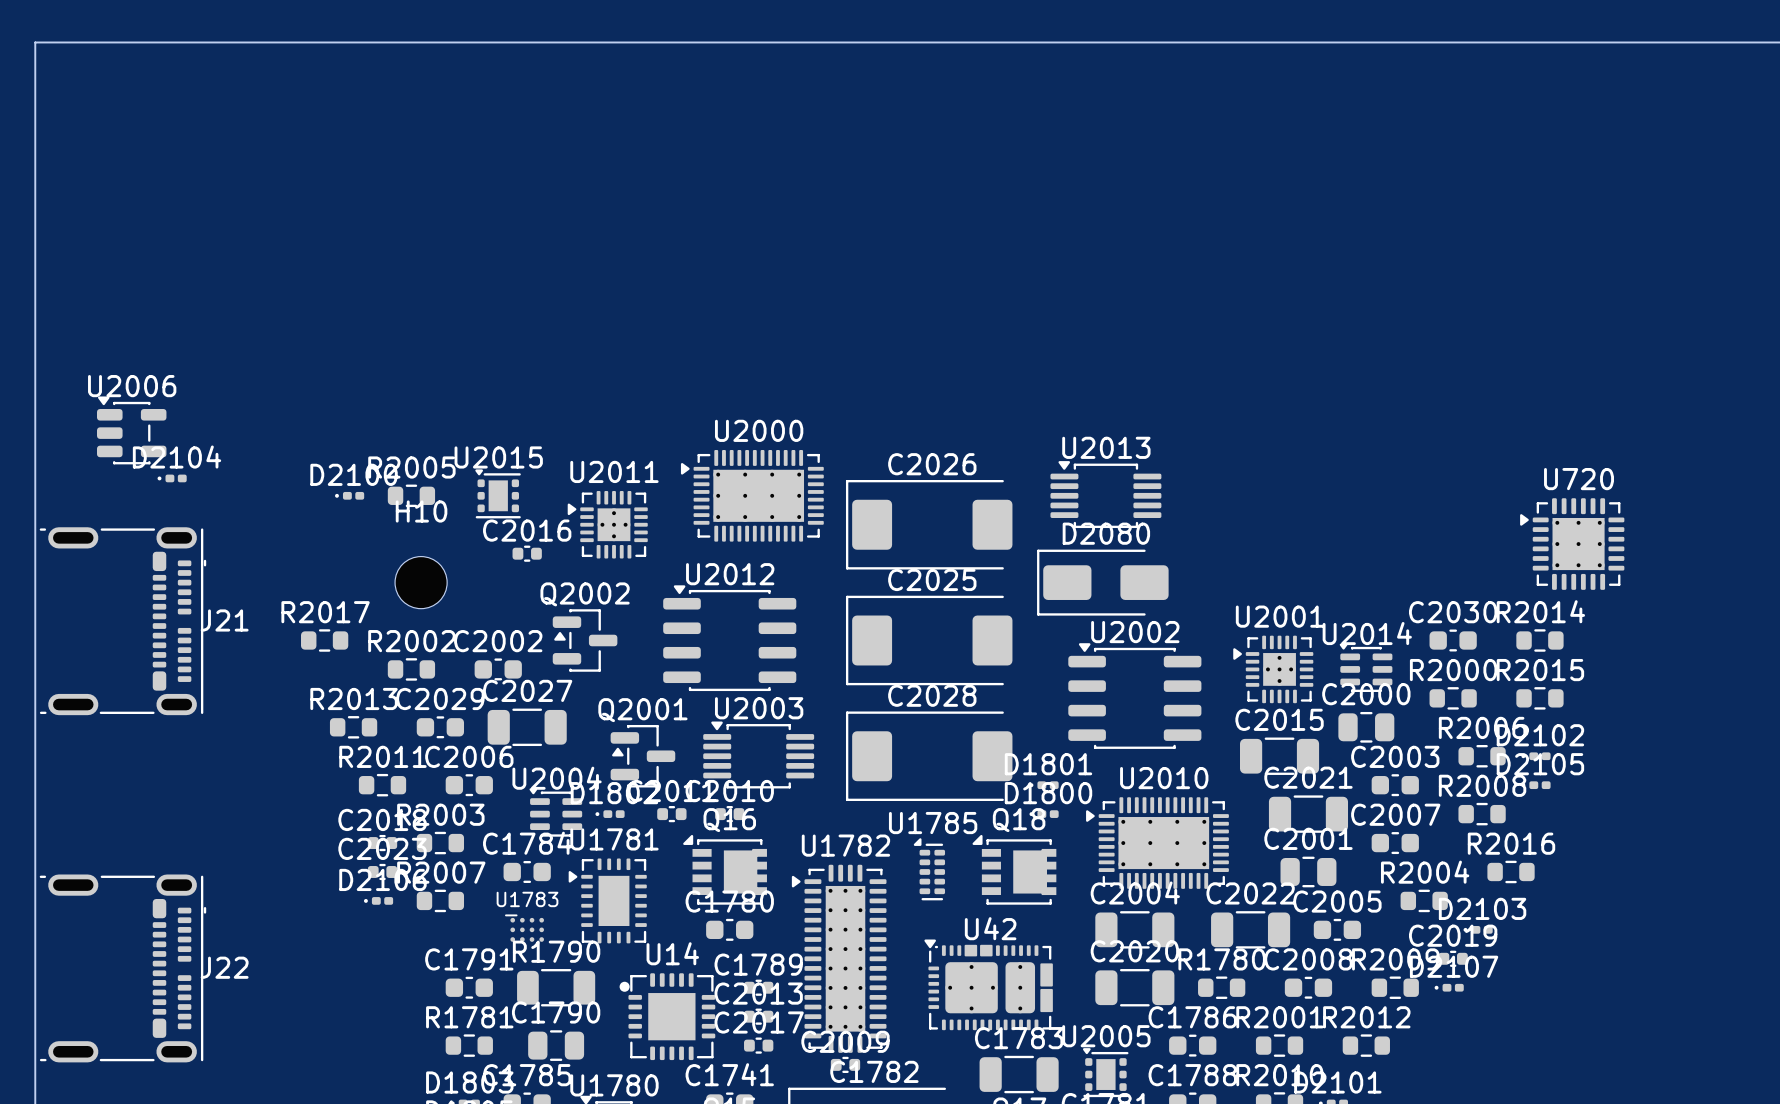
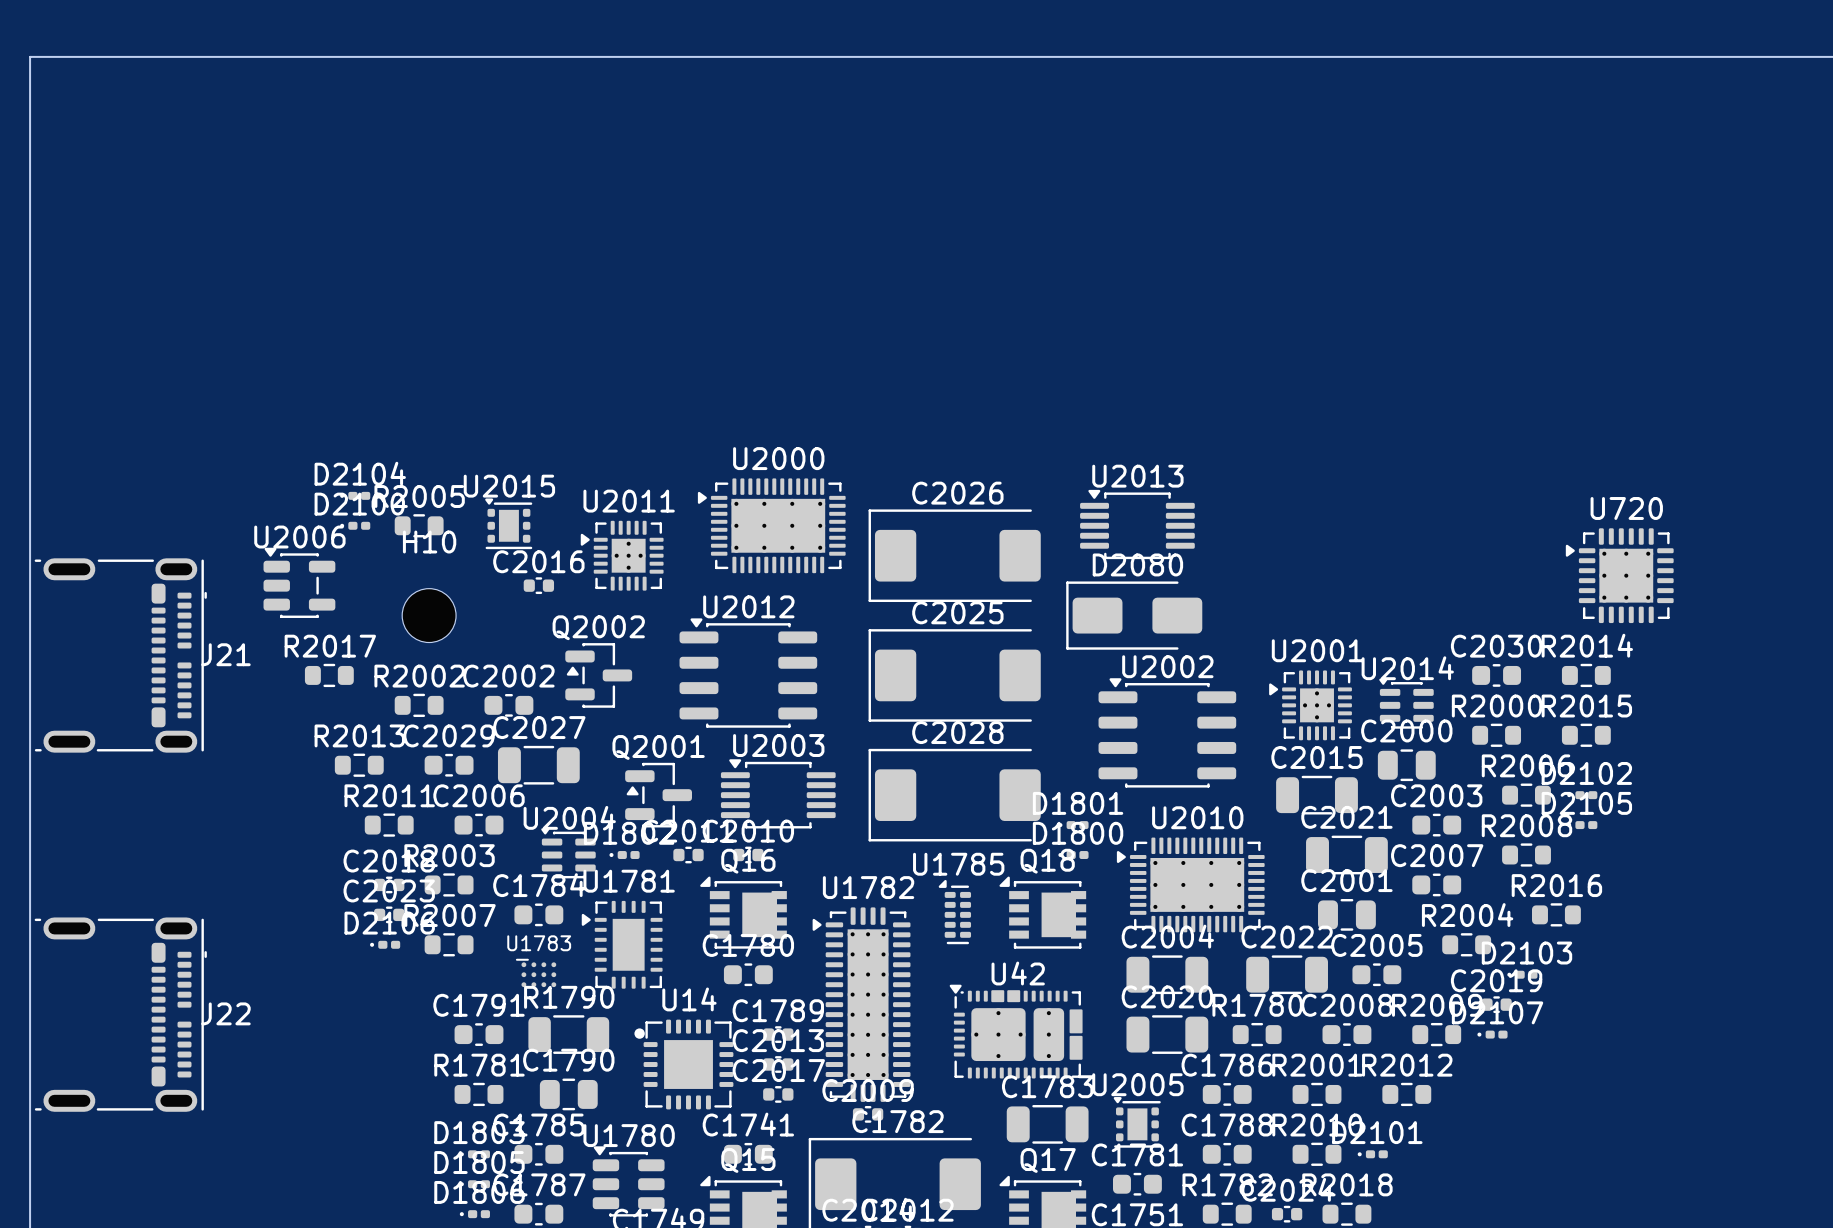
U2006 position: (131, 430) -> (299, 582)
D2104 position: (172, 478) -> (355, 495)

